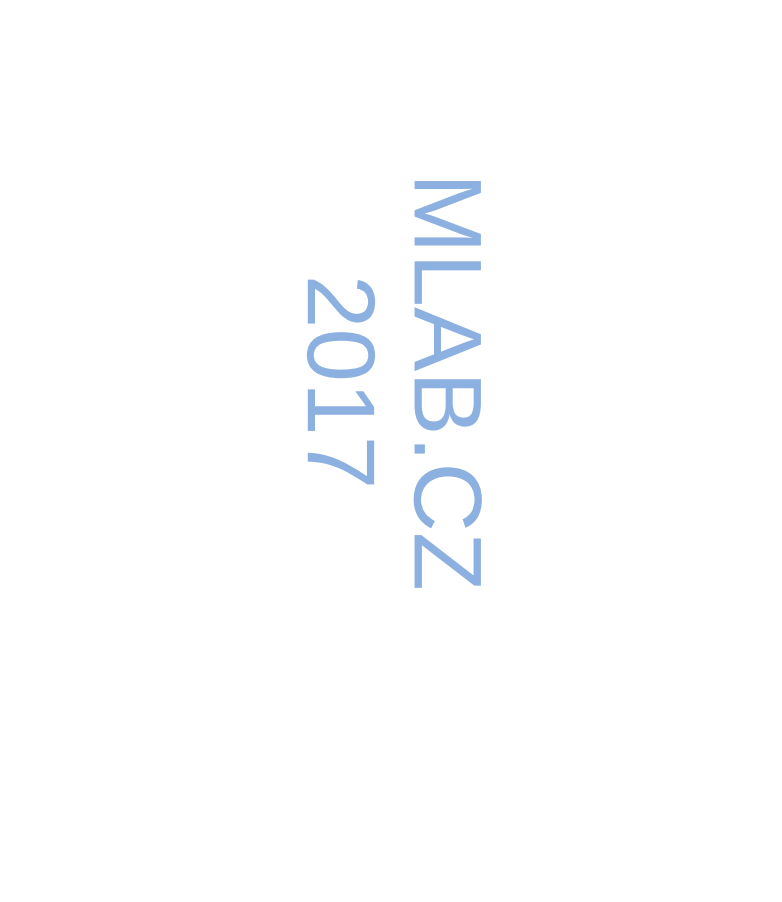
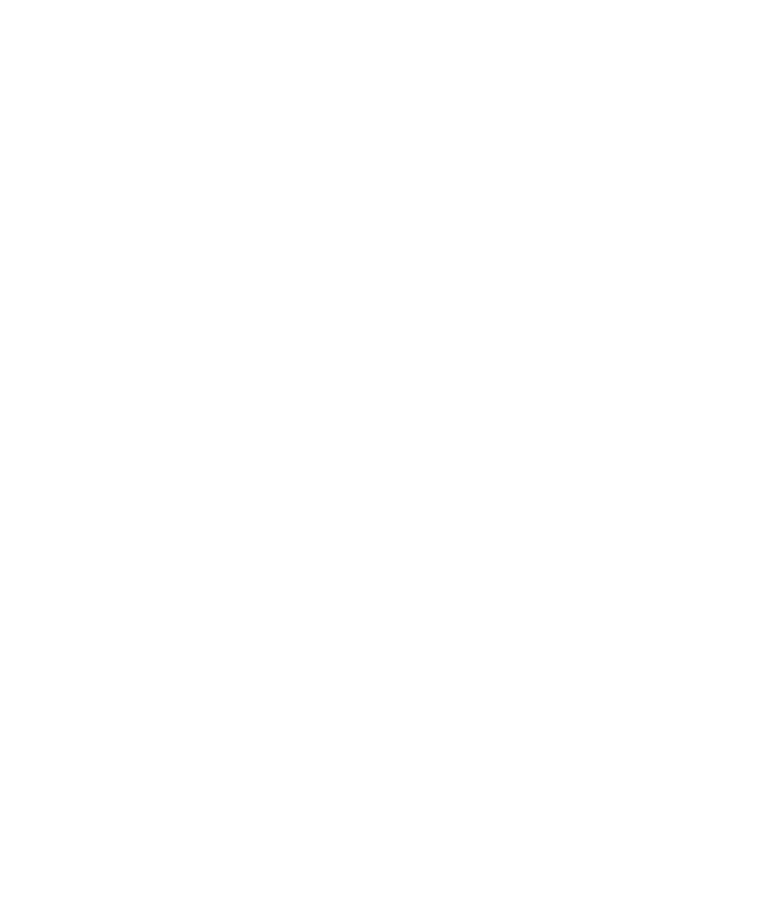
text: 2017 (340, 382) -> none
text: MLAB.CZ (447, 384) -> none

